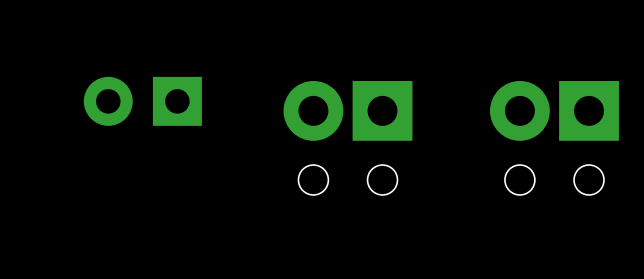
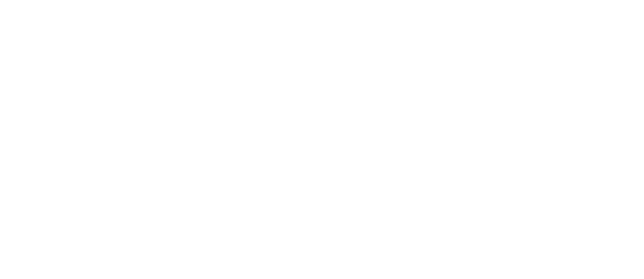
part: (142, 101) -> none
part: (347, 137) -> none
part: (554, 137) -> none

